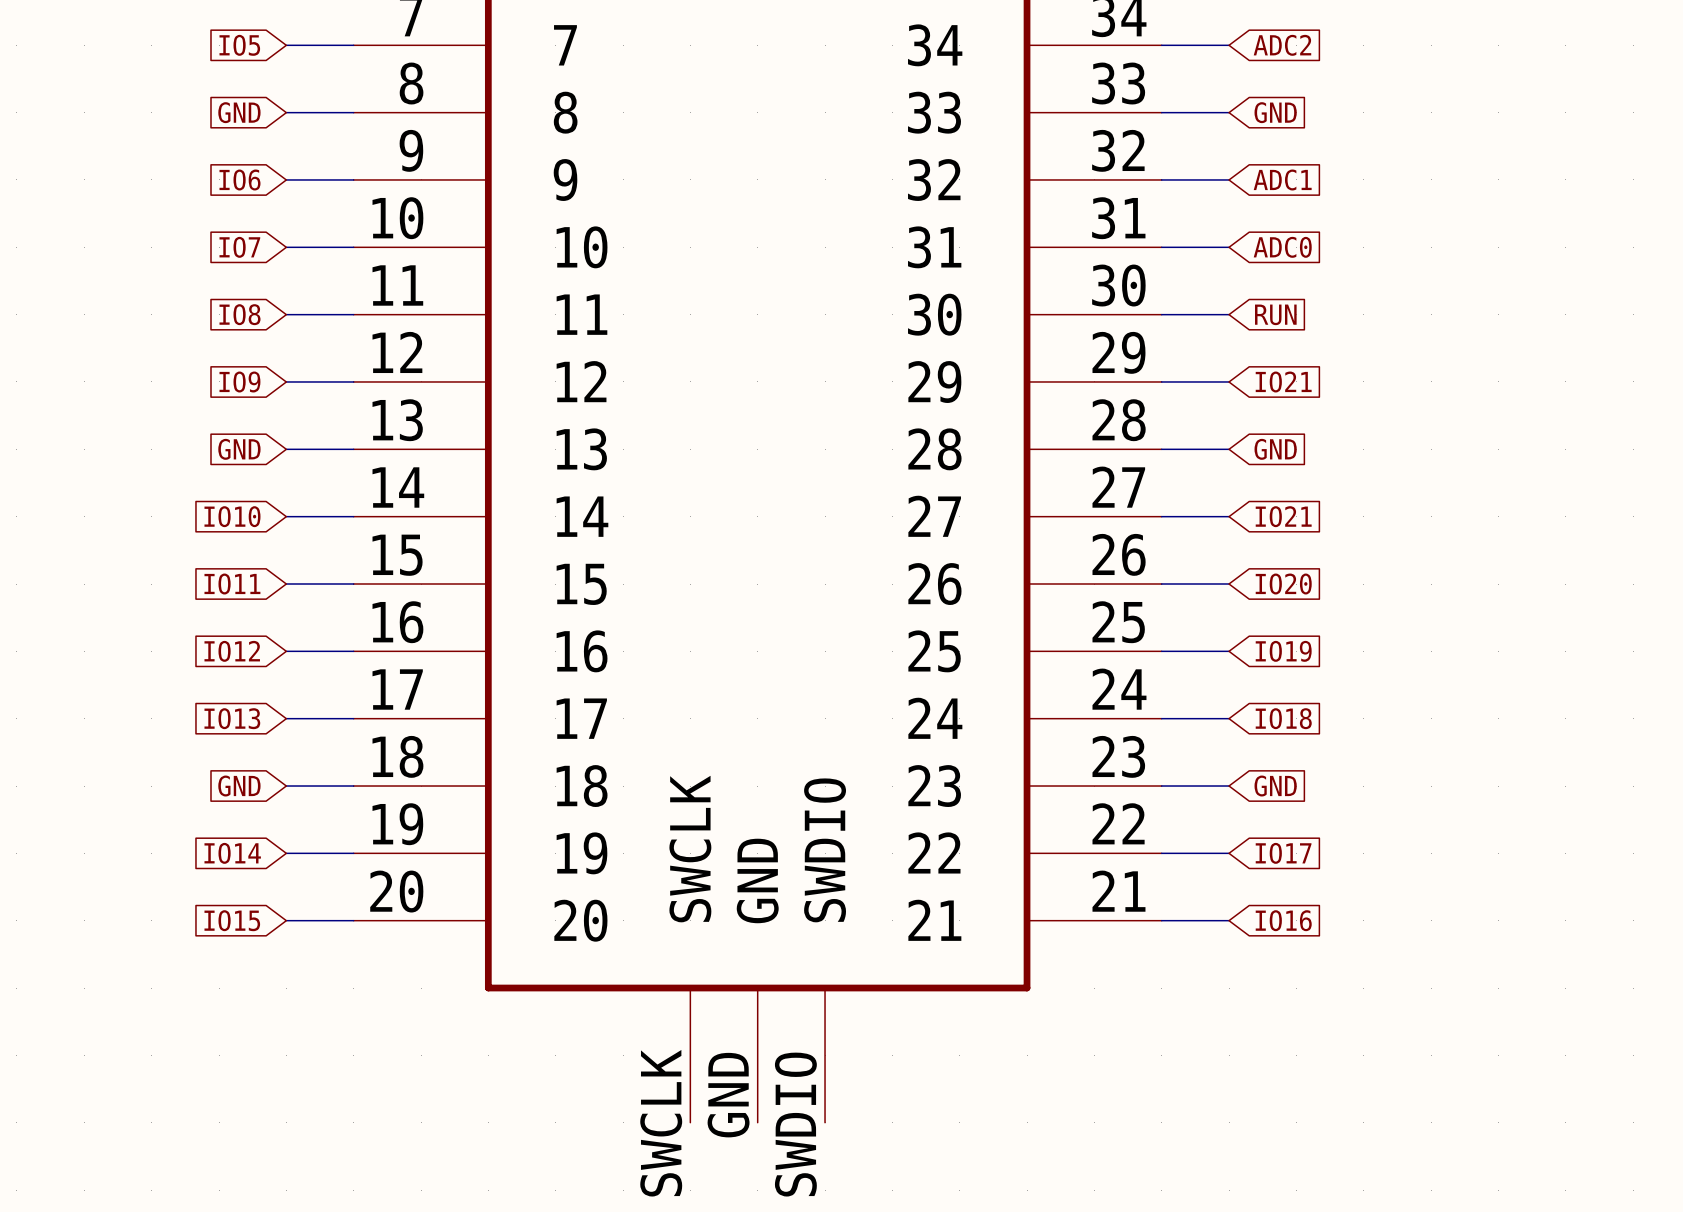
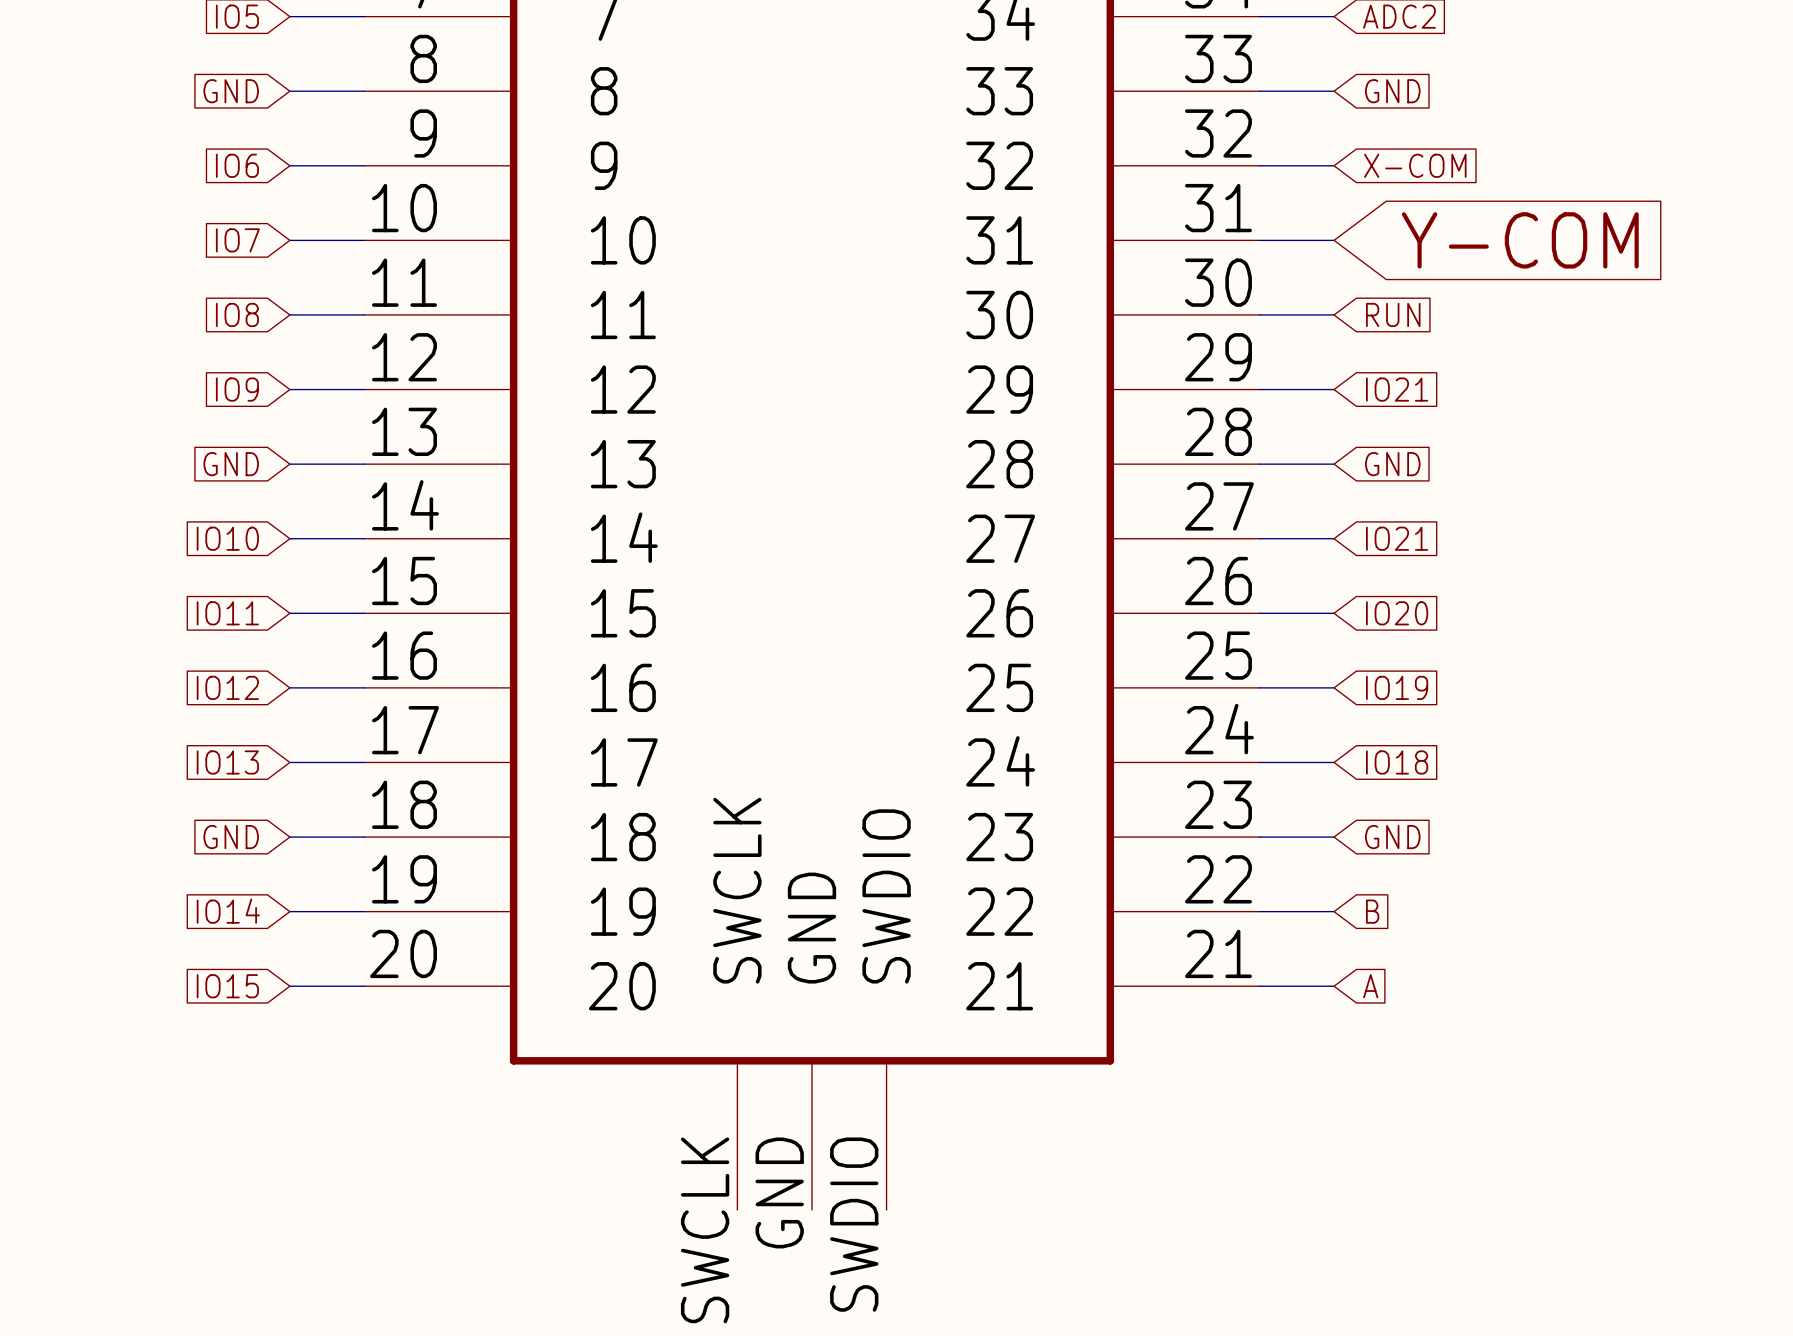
global label: ADC1 (1282, 180) -> X-COM (1415, 165)
global label: ADC0 (1282, 247) -> Y-COM (1520, 240)
global label: IO17 (1283, 853) -> B (1372, 911)
global label: IO16 (1283, 920) -> A (1370, 986)

